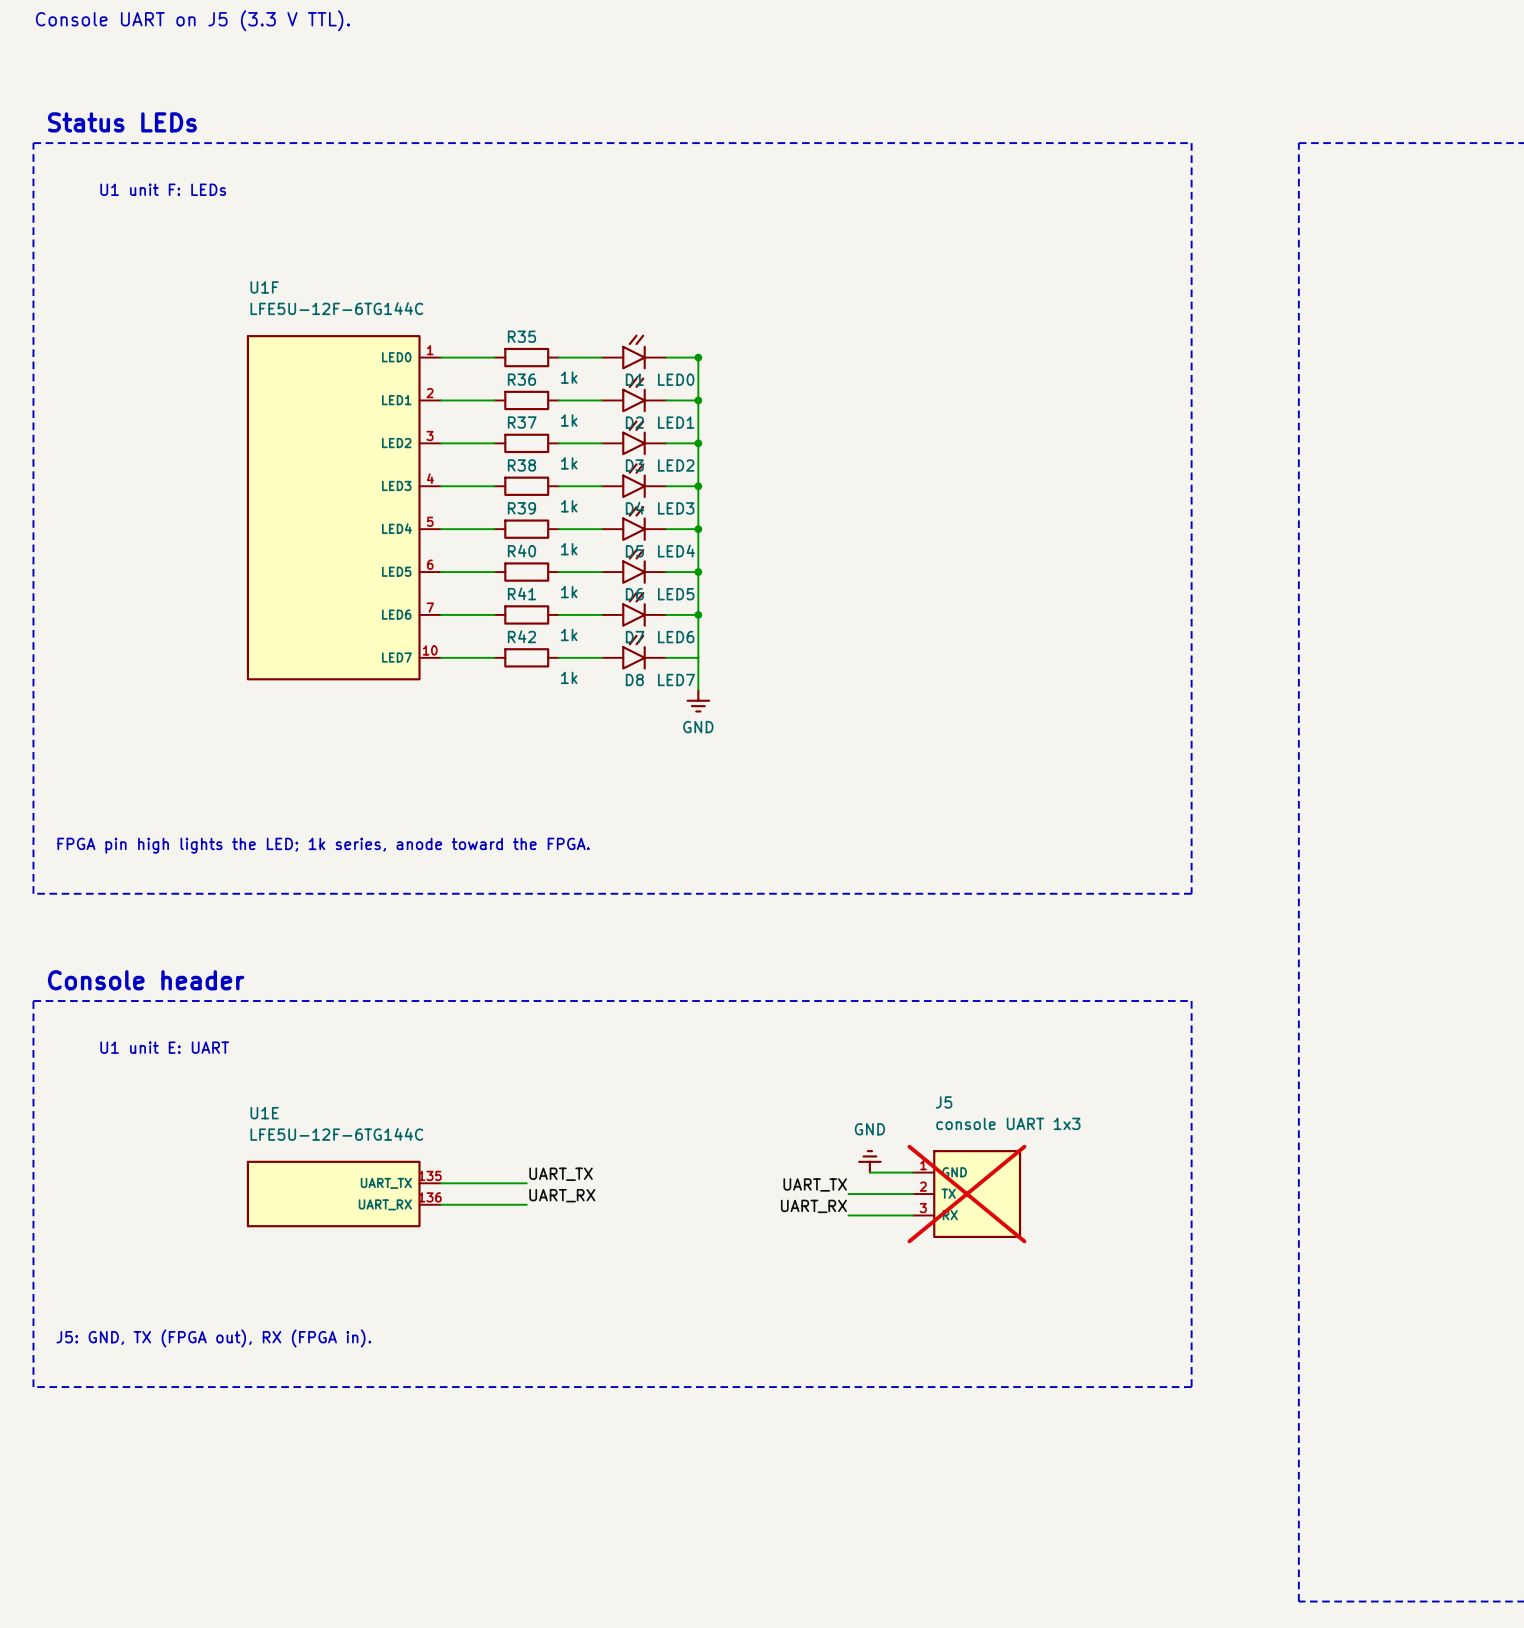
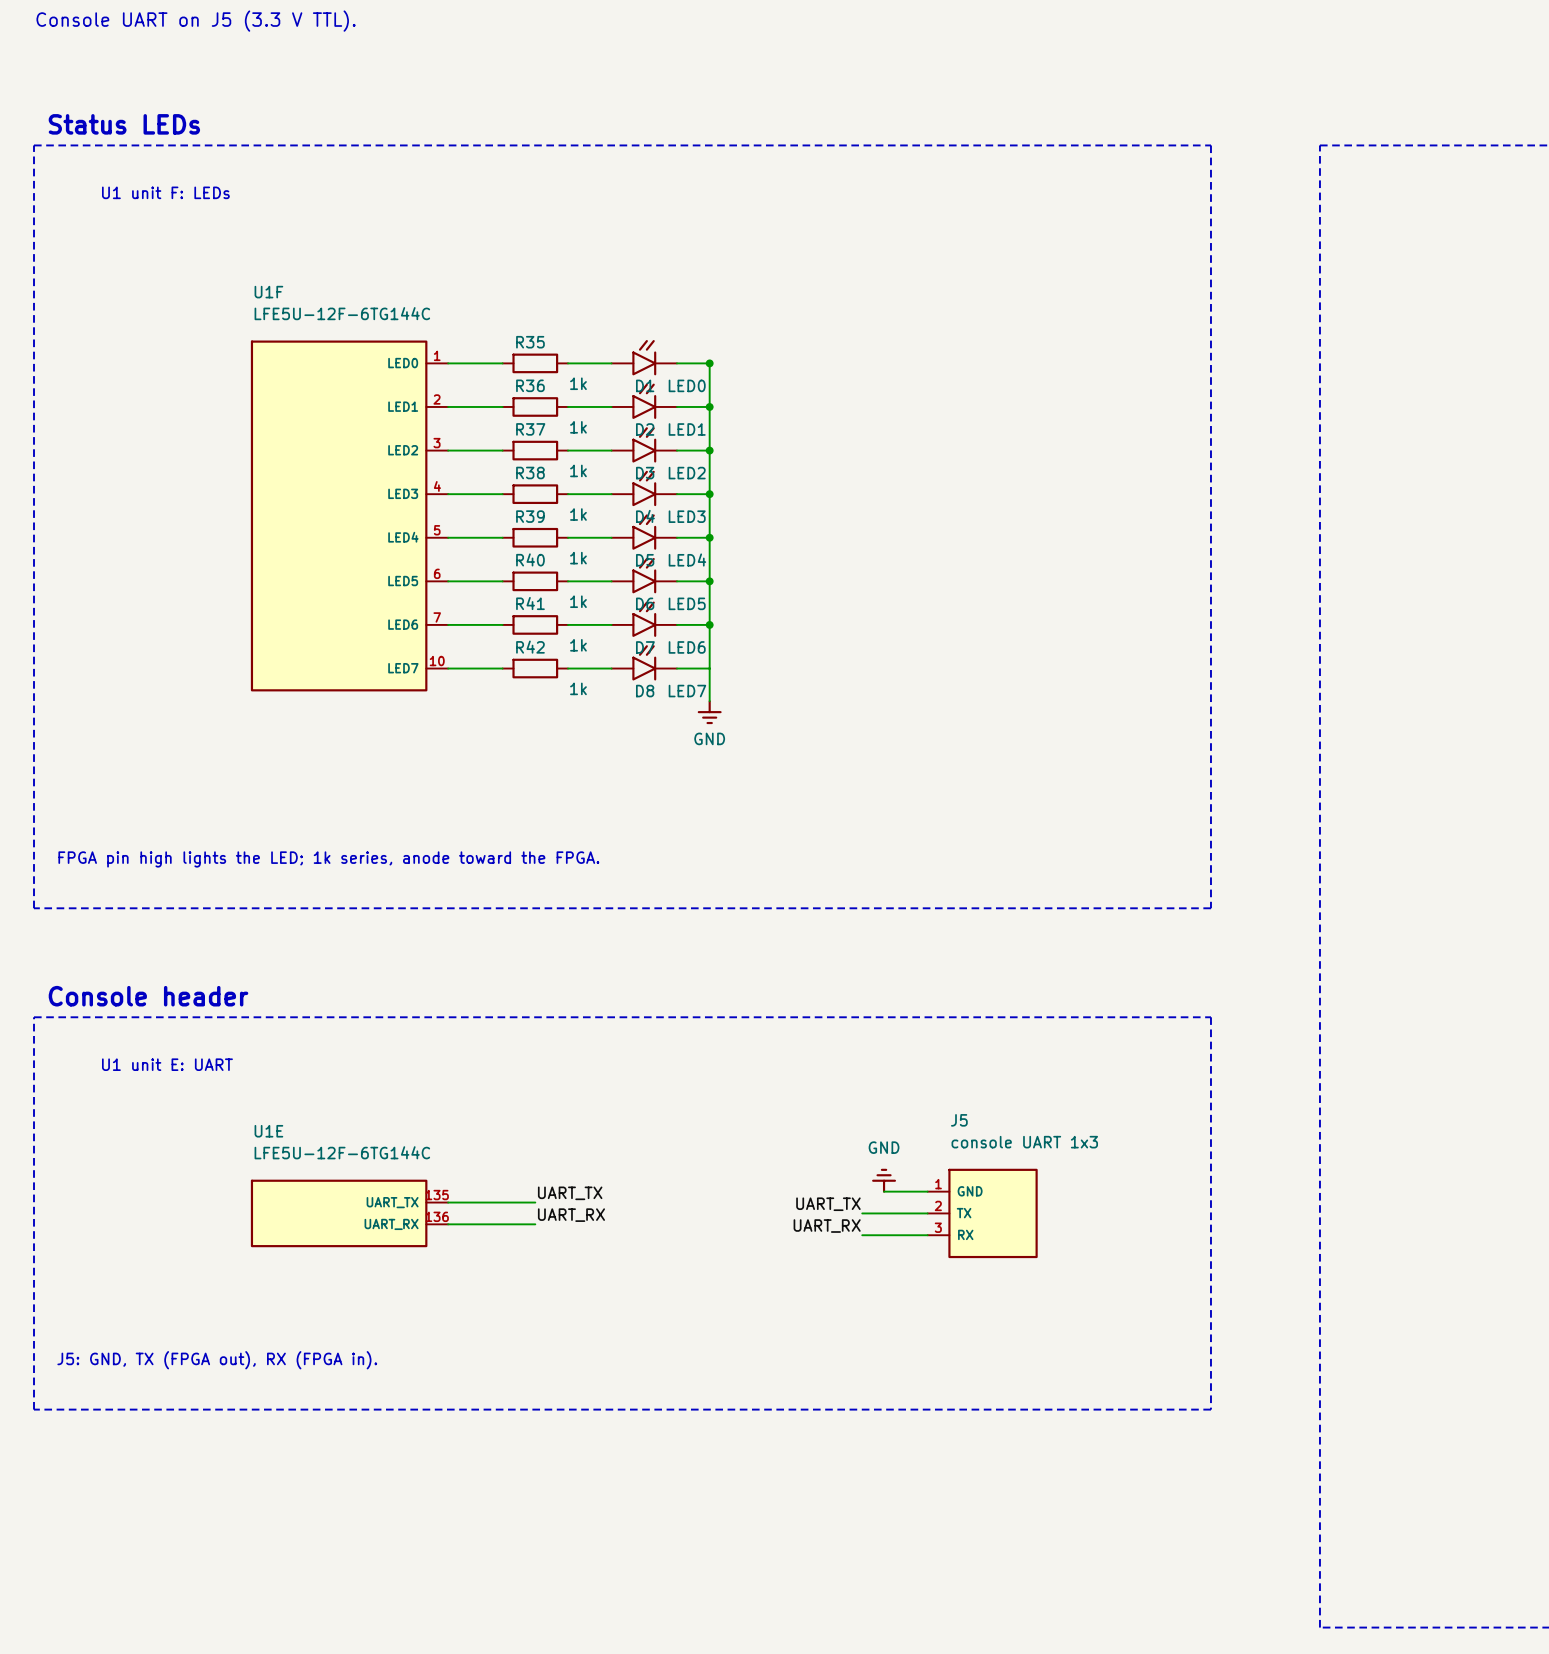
J5 do-not-place cross: (966, 1194) -> none

